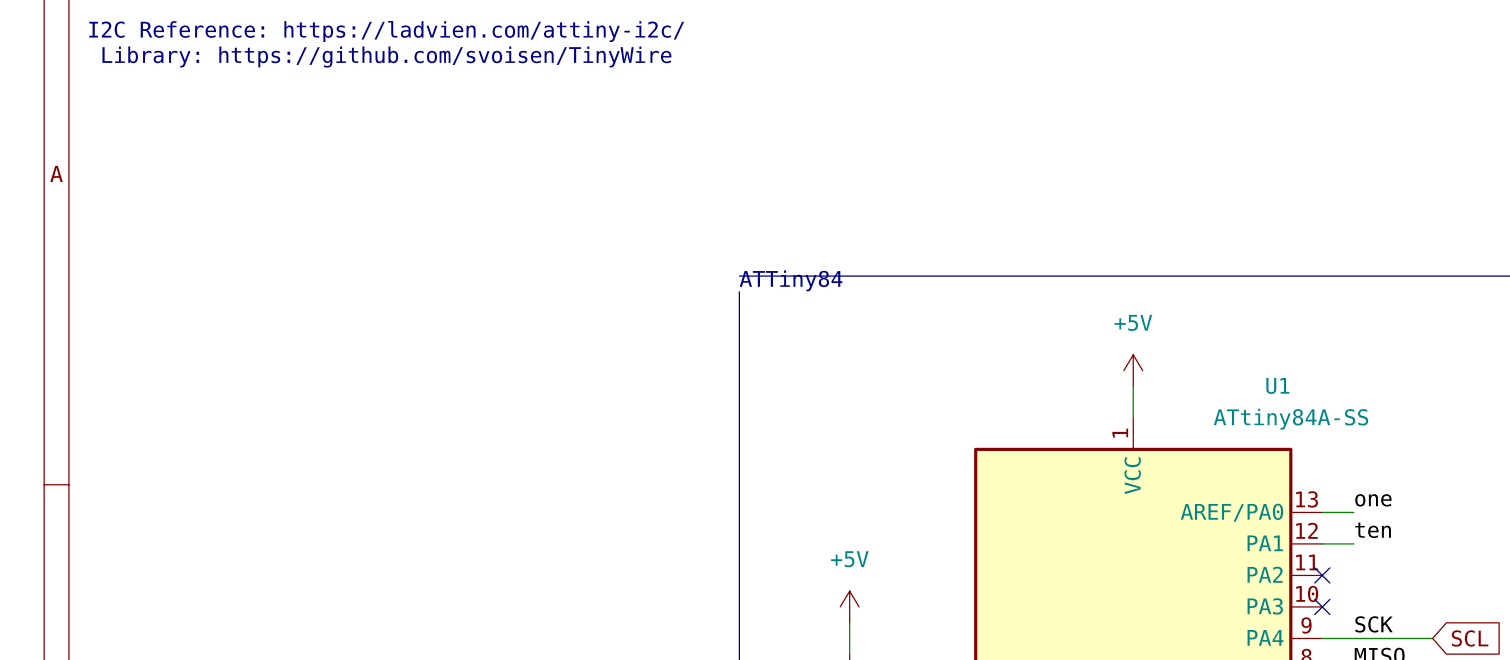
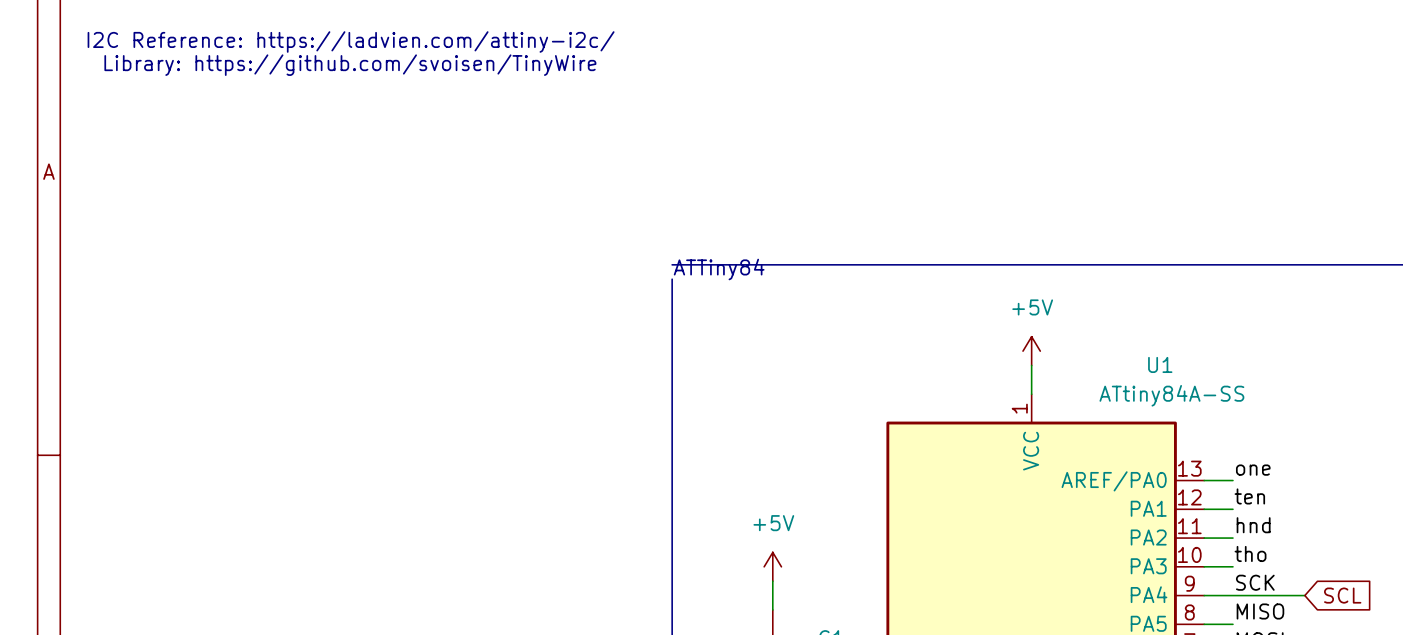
label: none -> hnd (1253, 525)
wire: none -> (1204, 538) (1232, 538)
no-connect mark: (1322, 575) -> none
label: none -> tho (1250, 553)
wire: none -> (1204, 566) (1232, 566)
no-connect mark: (1322, 606) -> none

